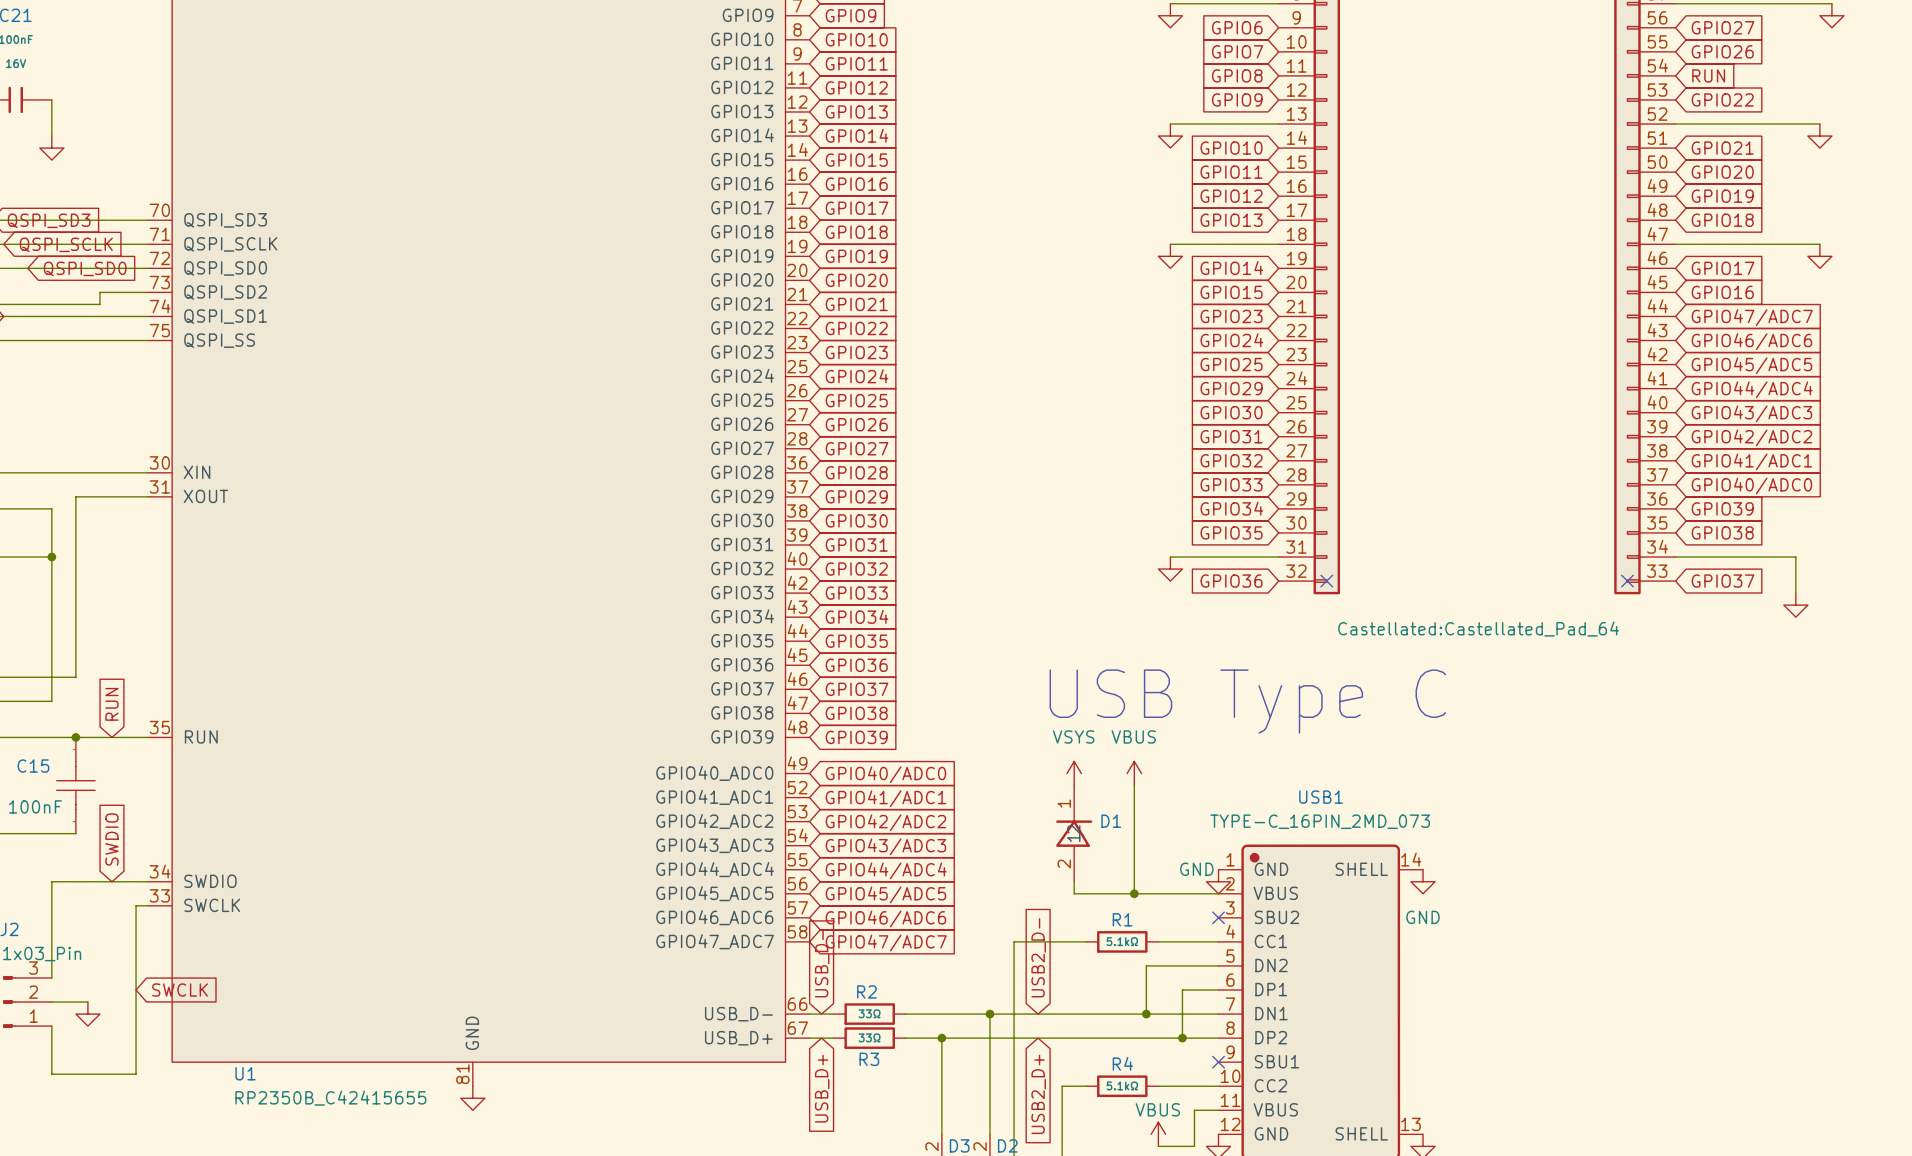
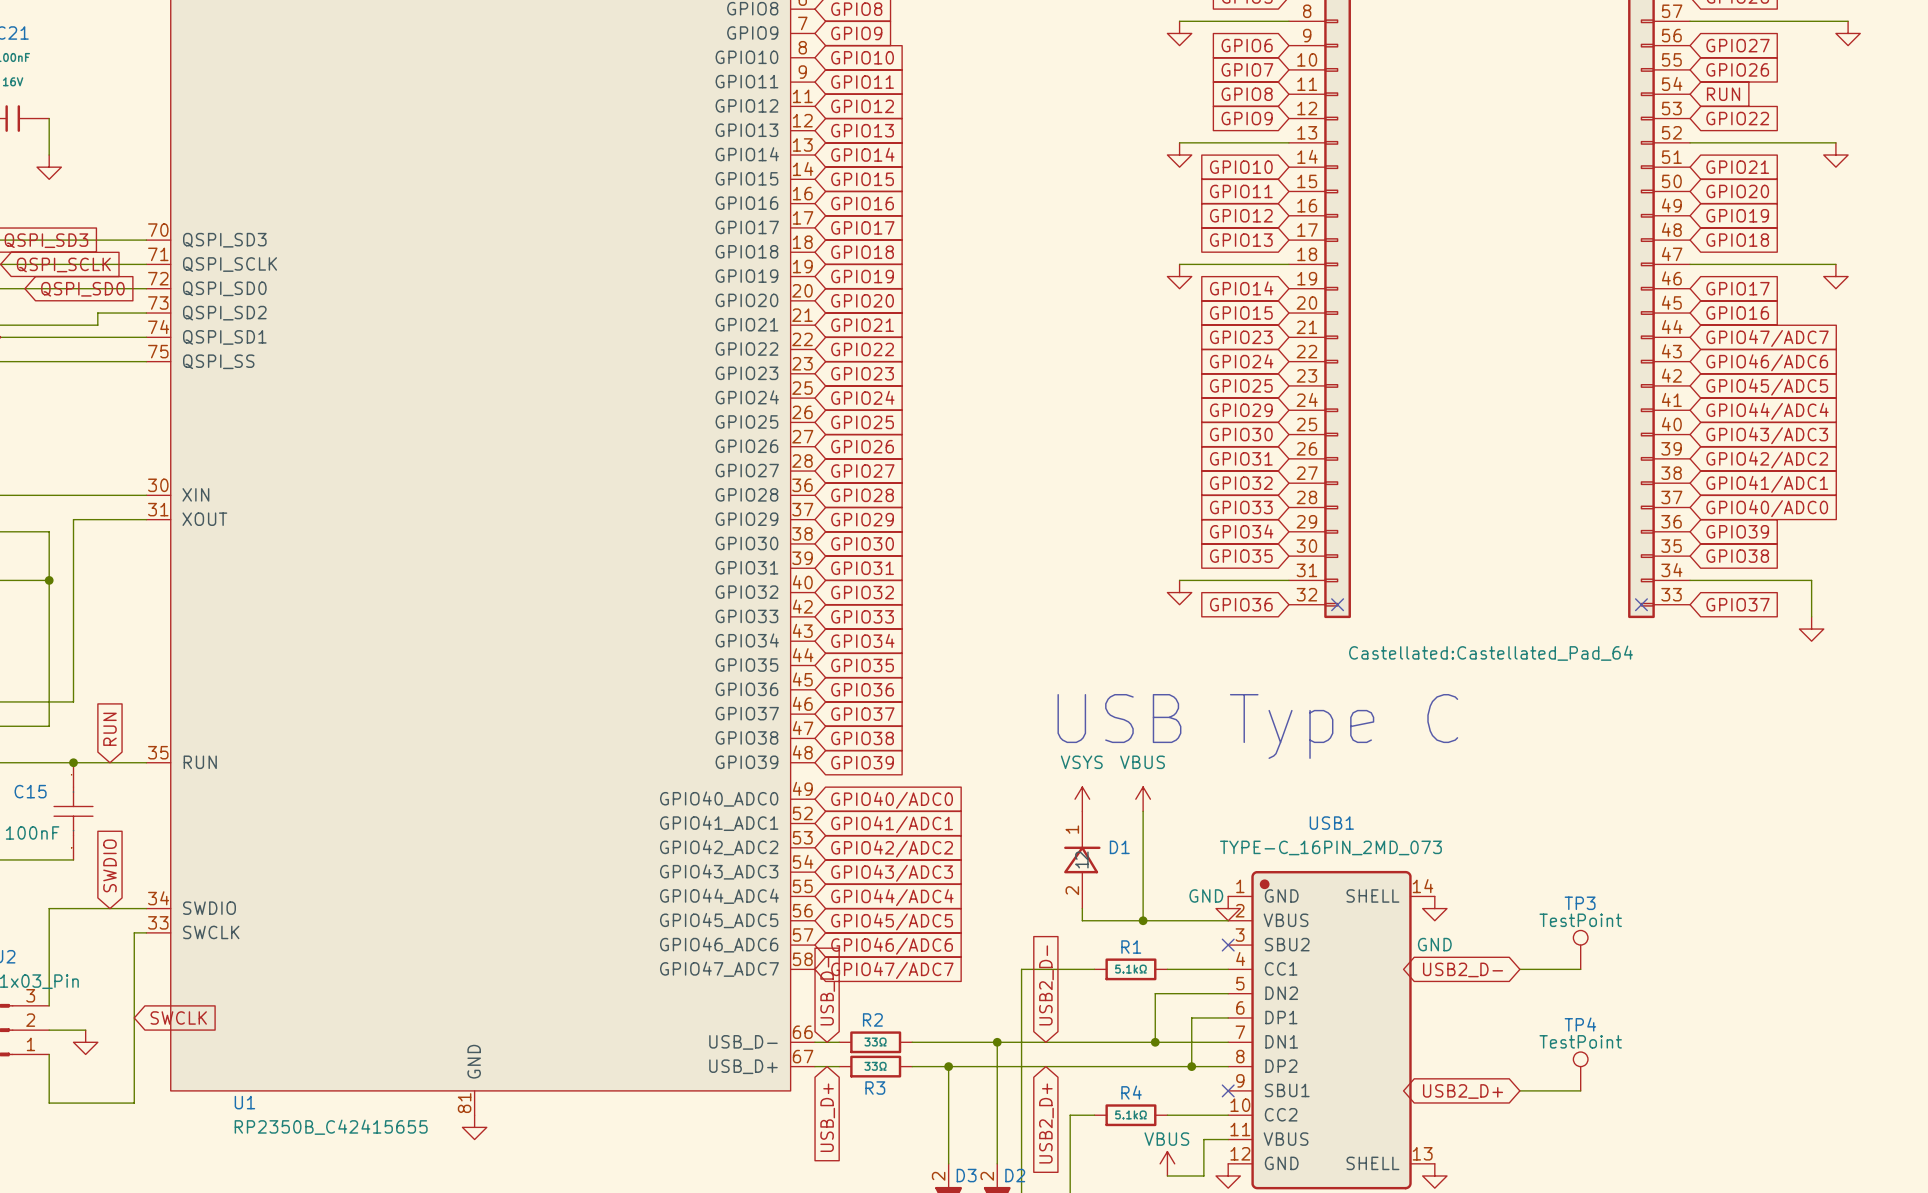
TP3: none -> TestPoint (1580, 949)
wire: none -> (1519, 969) (1580, 969)
global label: none -> USB2_D- (1463, 969)
TP4: none -> TestPoint (1580, 1071)
global label: none -> USB2_D+ (1463, 1091)
wire: none -> (1519, 1090) (1580, 1090)

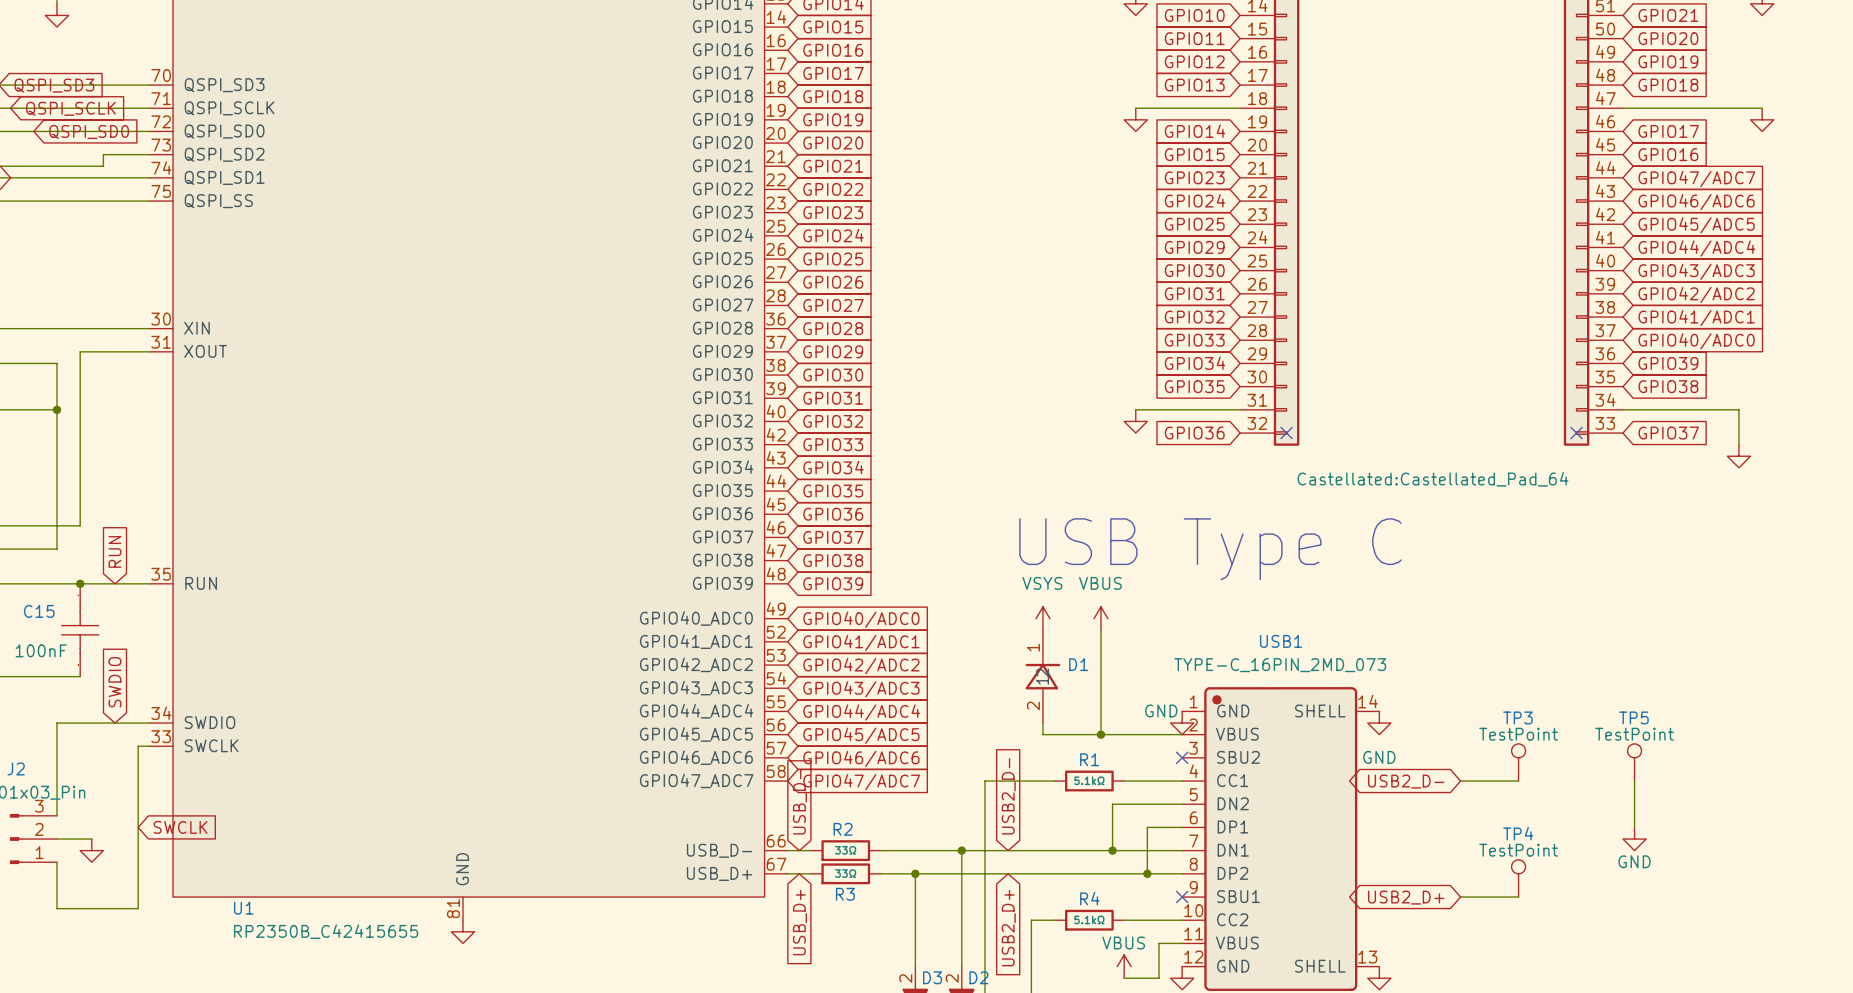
TP5: none -> TestPoint (1634, 762)
wire: none -> (1634, 781) (1634, 827)
power symbol: none -> GND (1634, 839)

